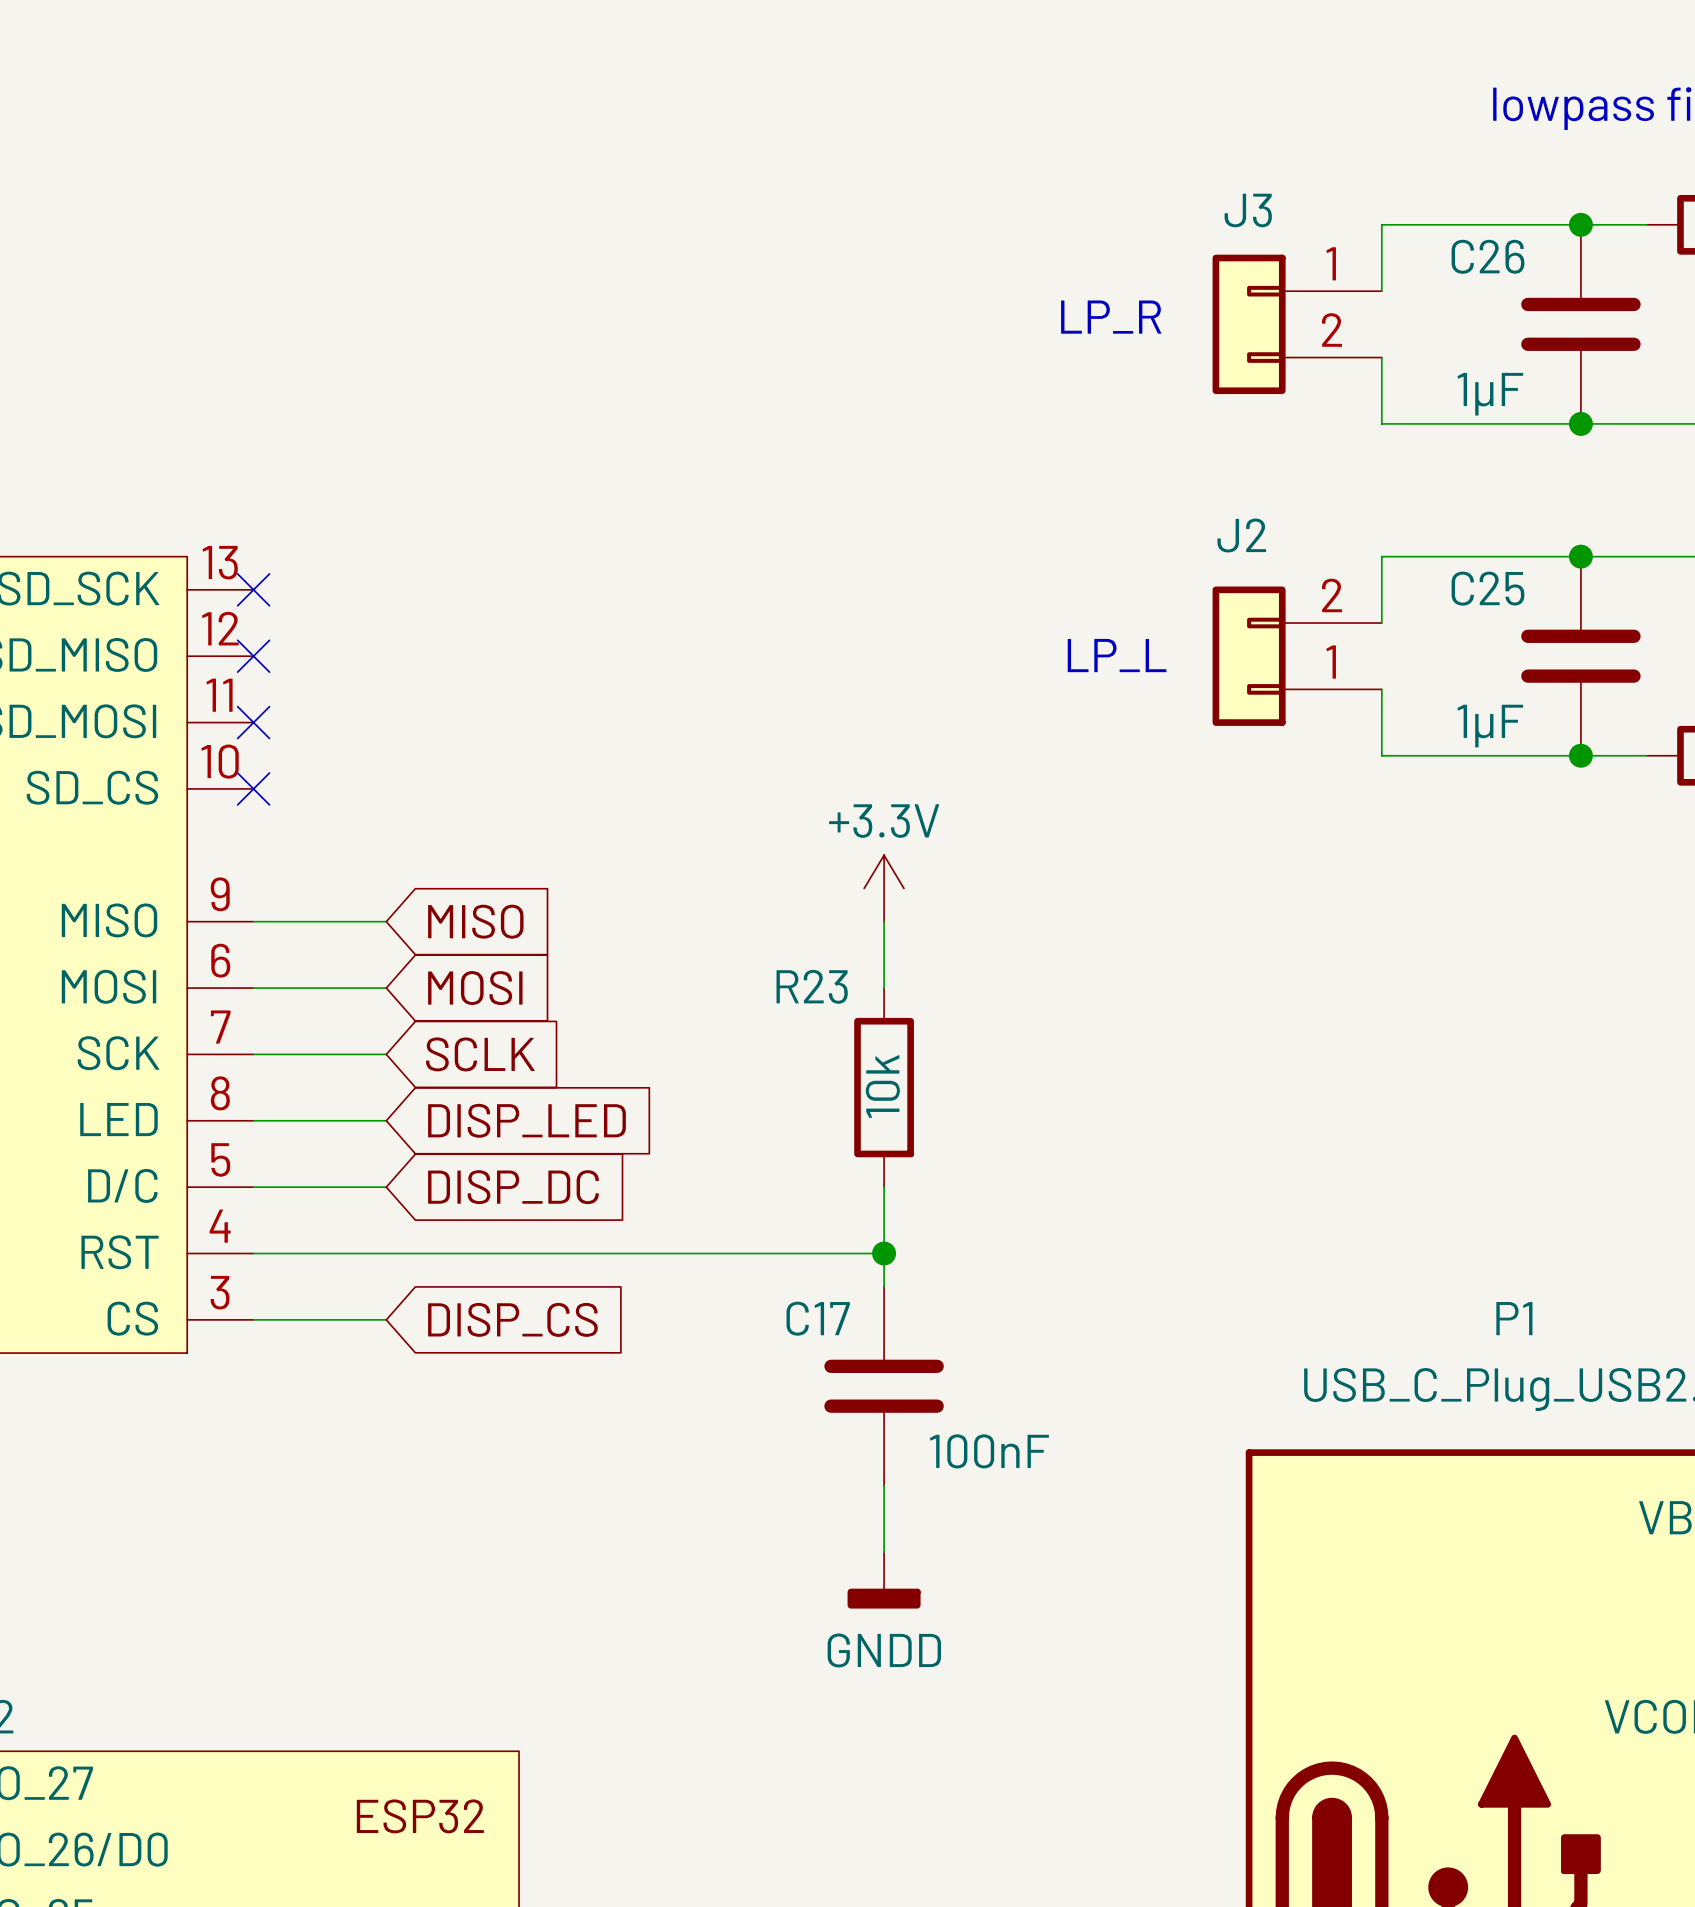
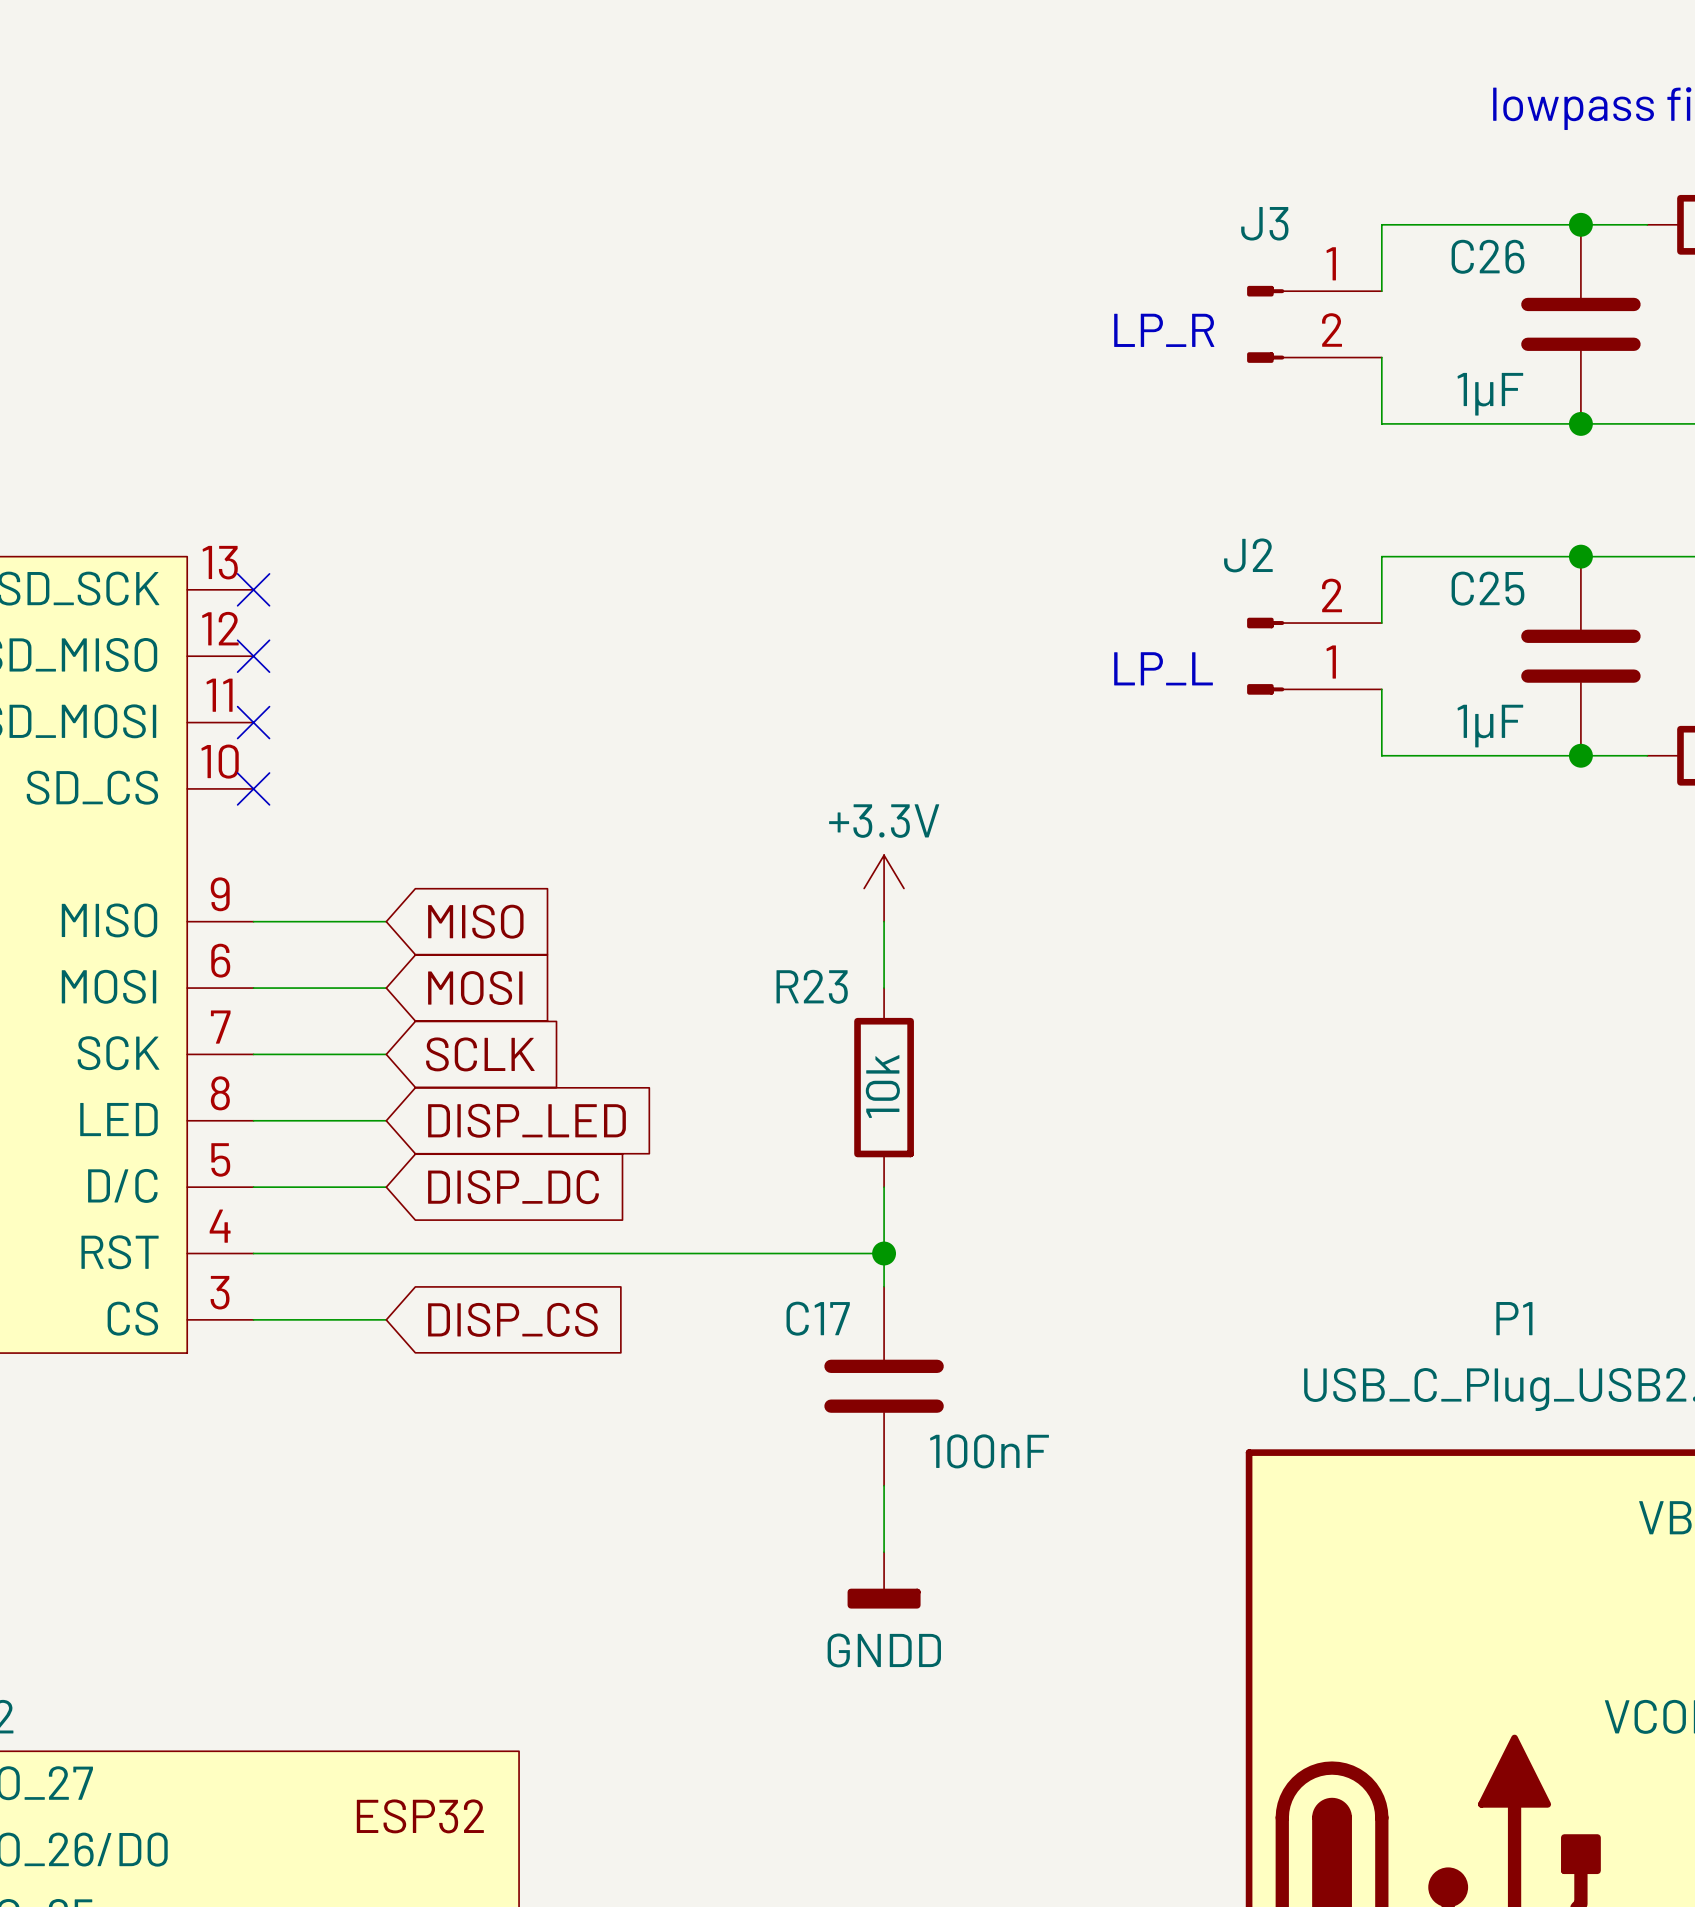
J3 symbol: [1212, 254, 1382, 395] -> [1247, 285, 1382, 363]
text position: LP_R (1111, 317) -> LP_R (1164, 330)
J2 symbol: [1212, 586, 1382, 726] -> [1247, 617, 1382, 695]
text position: LP_L (1117, 655) -> LP_L (1163, 668)

